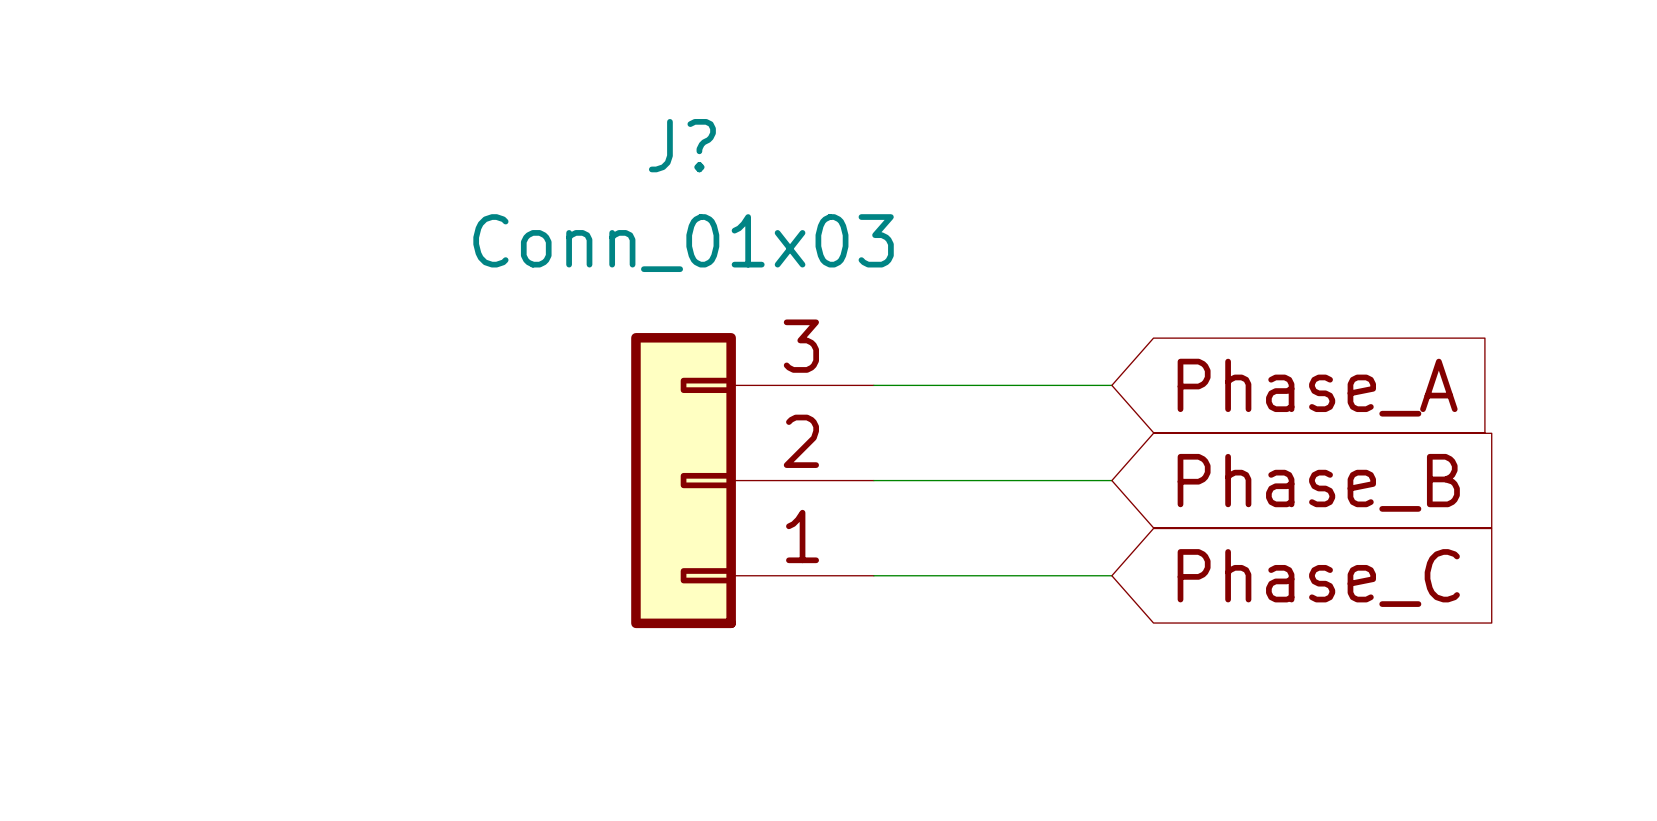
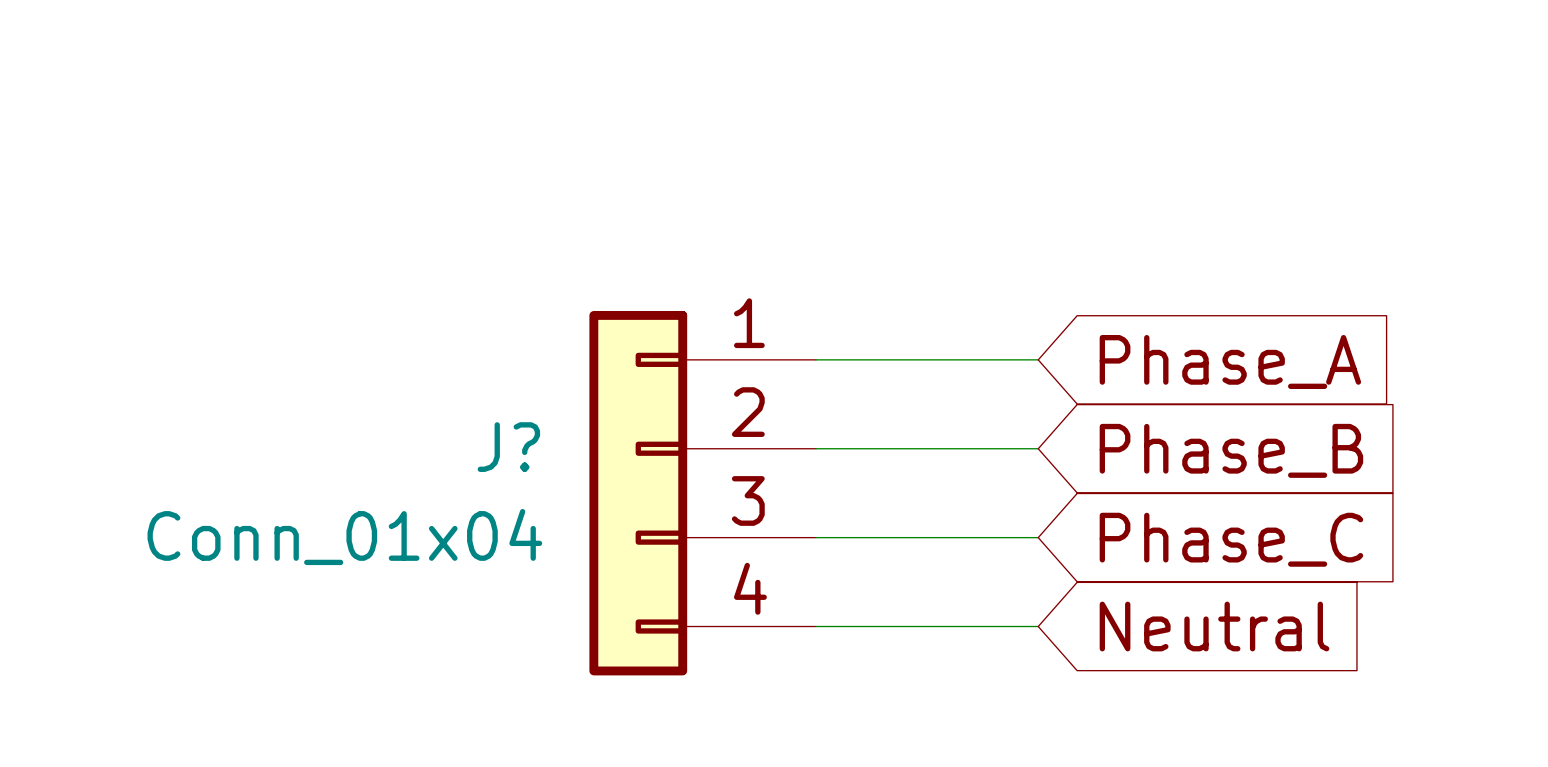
J?: Conn_01x03 (752, 480) -> none
J?: none -> Conn_01x04 (702, 493)
wire: none -> (816, 626) (1038, 626)
global label: none -> Neutral (1214, 626)

